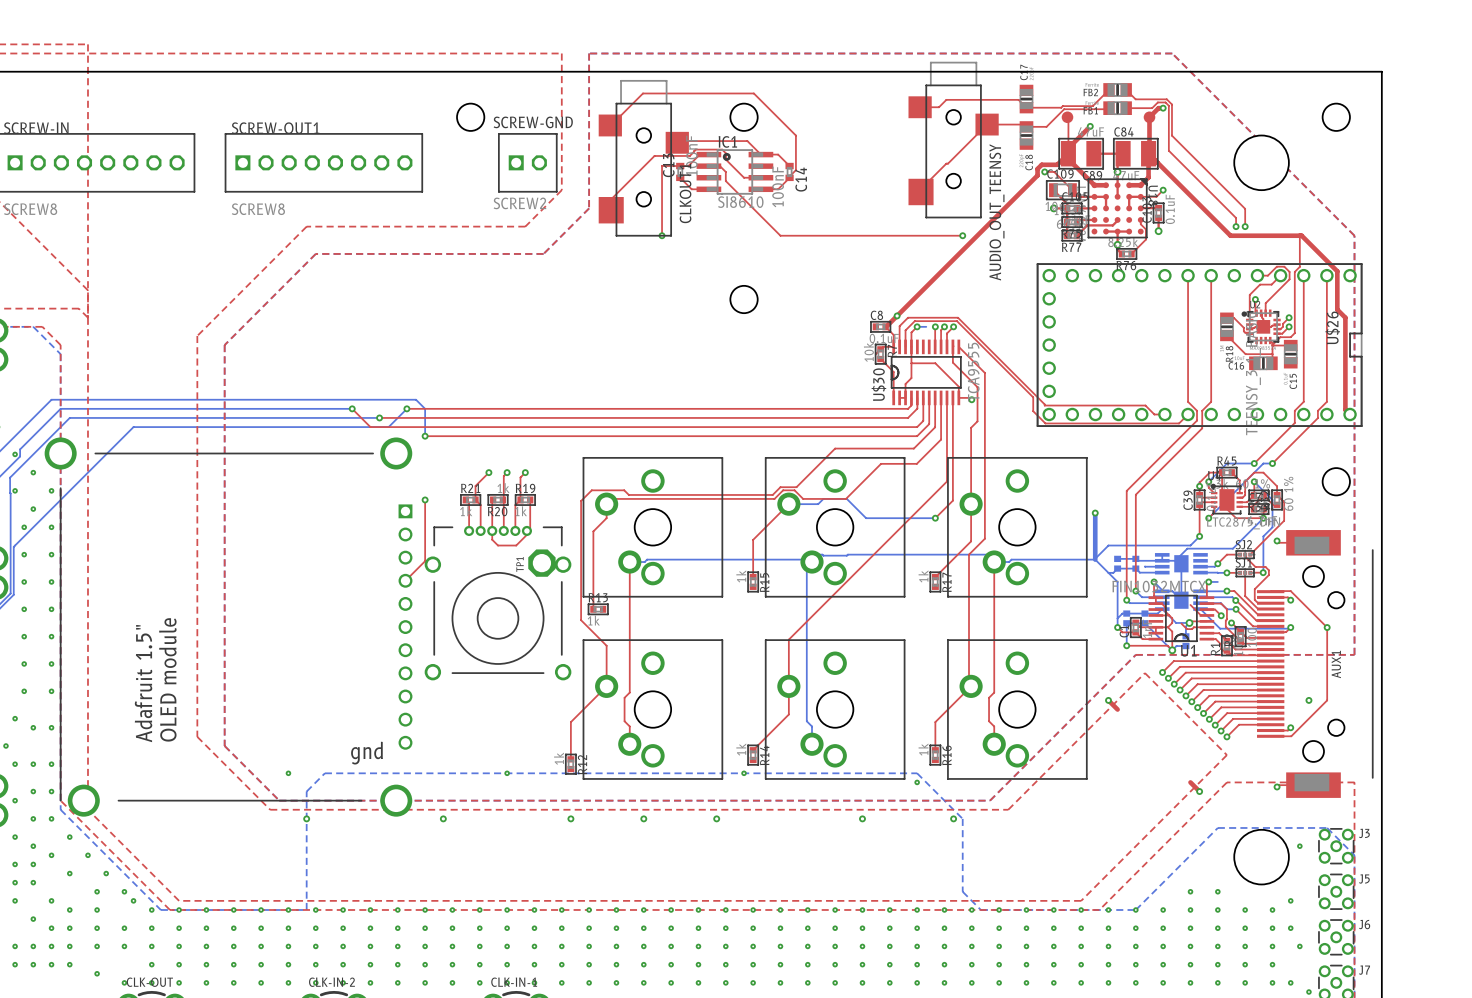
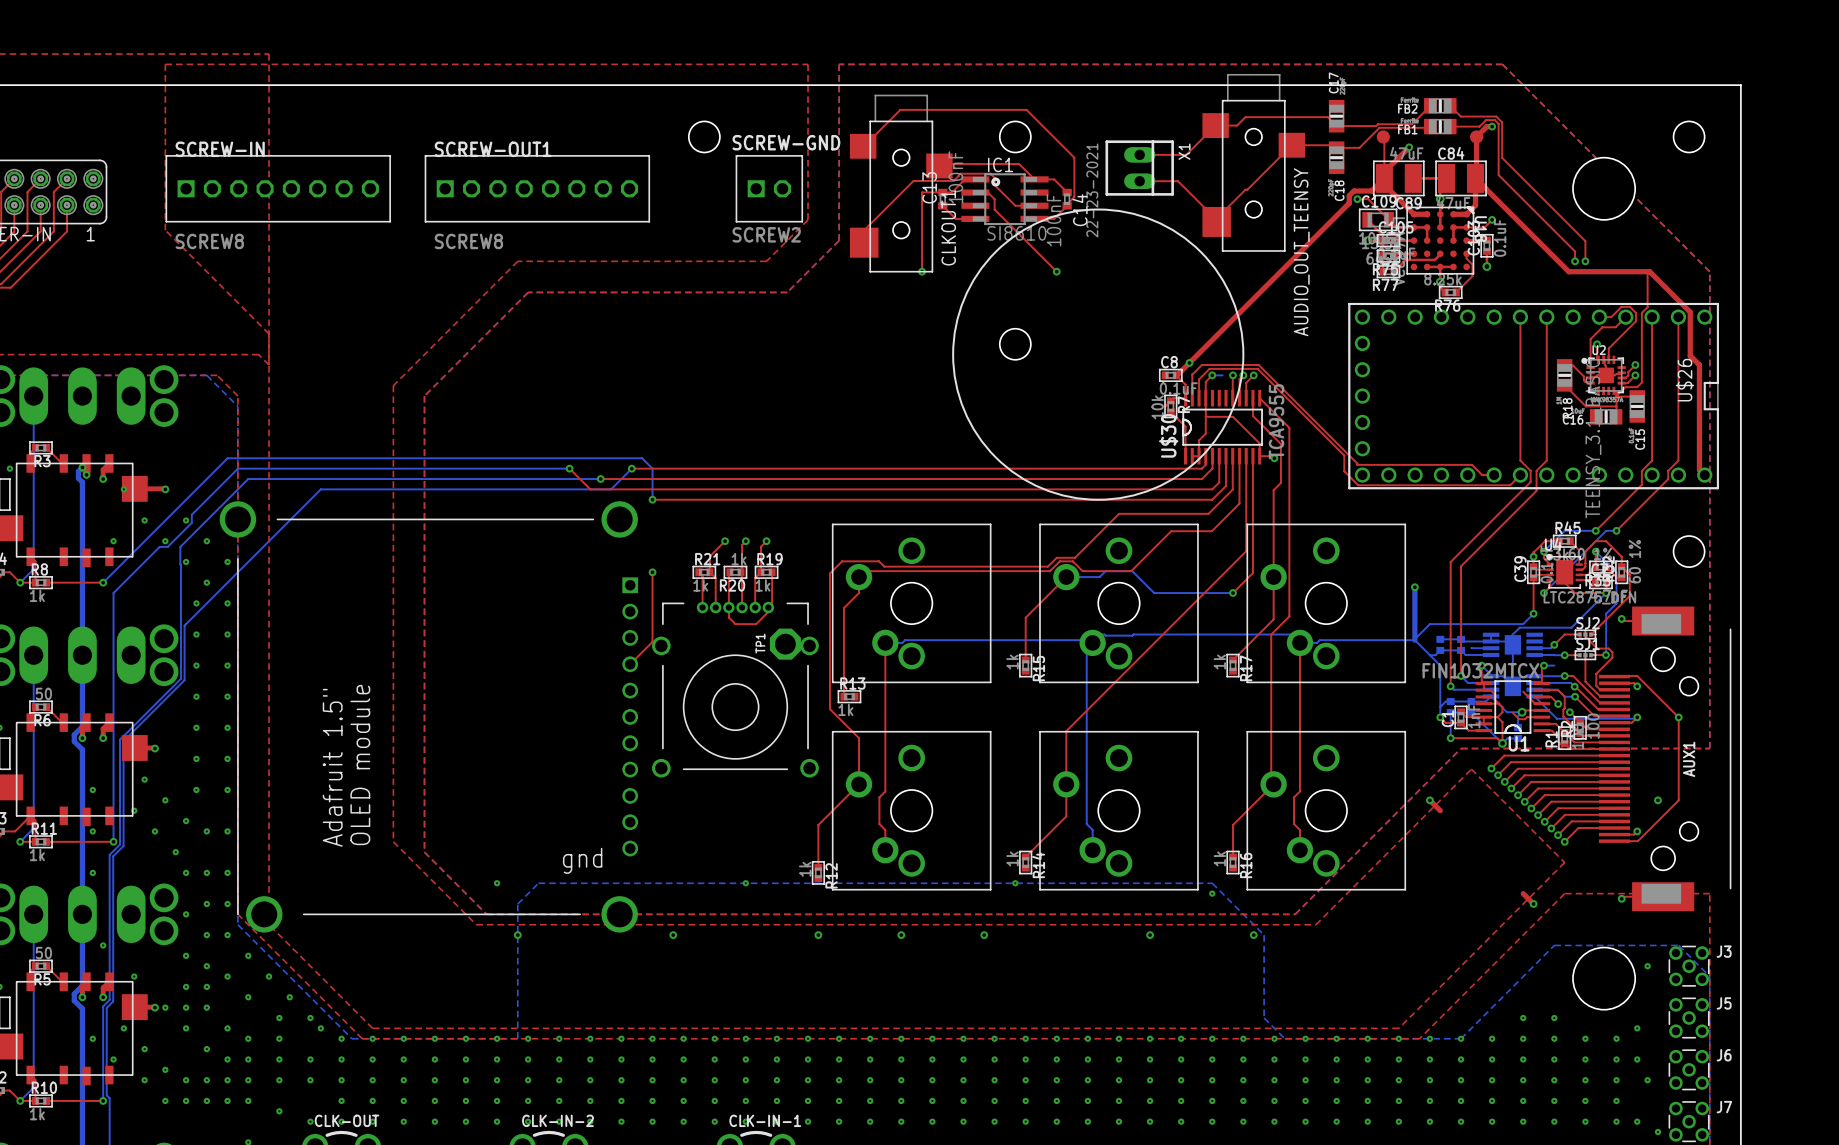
top track: none -> (1215, 125) (1186, 154) (1139, 154)
X1: none -> 22-23-2021 (1139, 168)
top track: none -> (1139, 181) (1178, 181) (1216, 219)
drawing: none -> [952, 208, 1245, 501]
top track: (780, 235) (962, 235) -> none
via: none -> (1056, 271)
via: (962, 235) -> none

